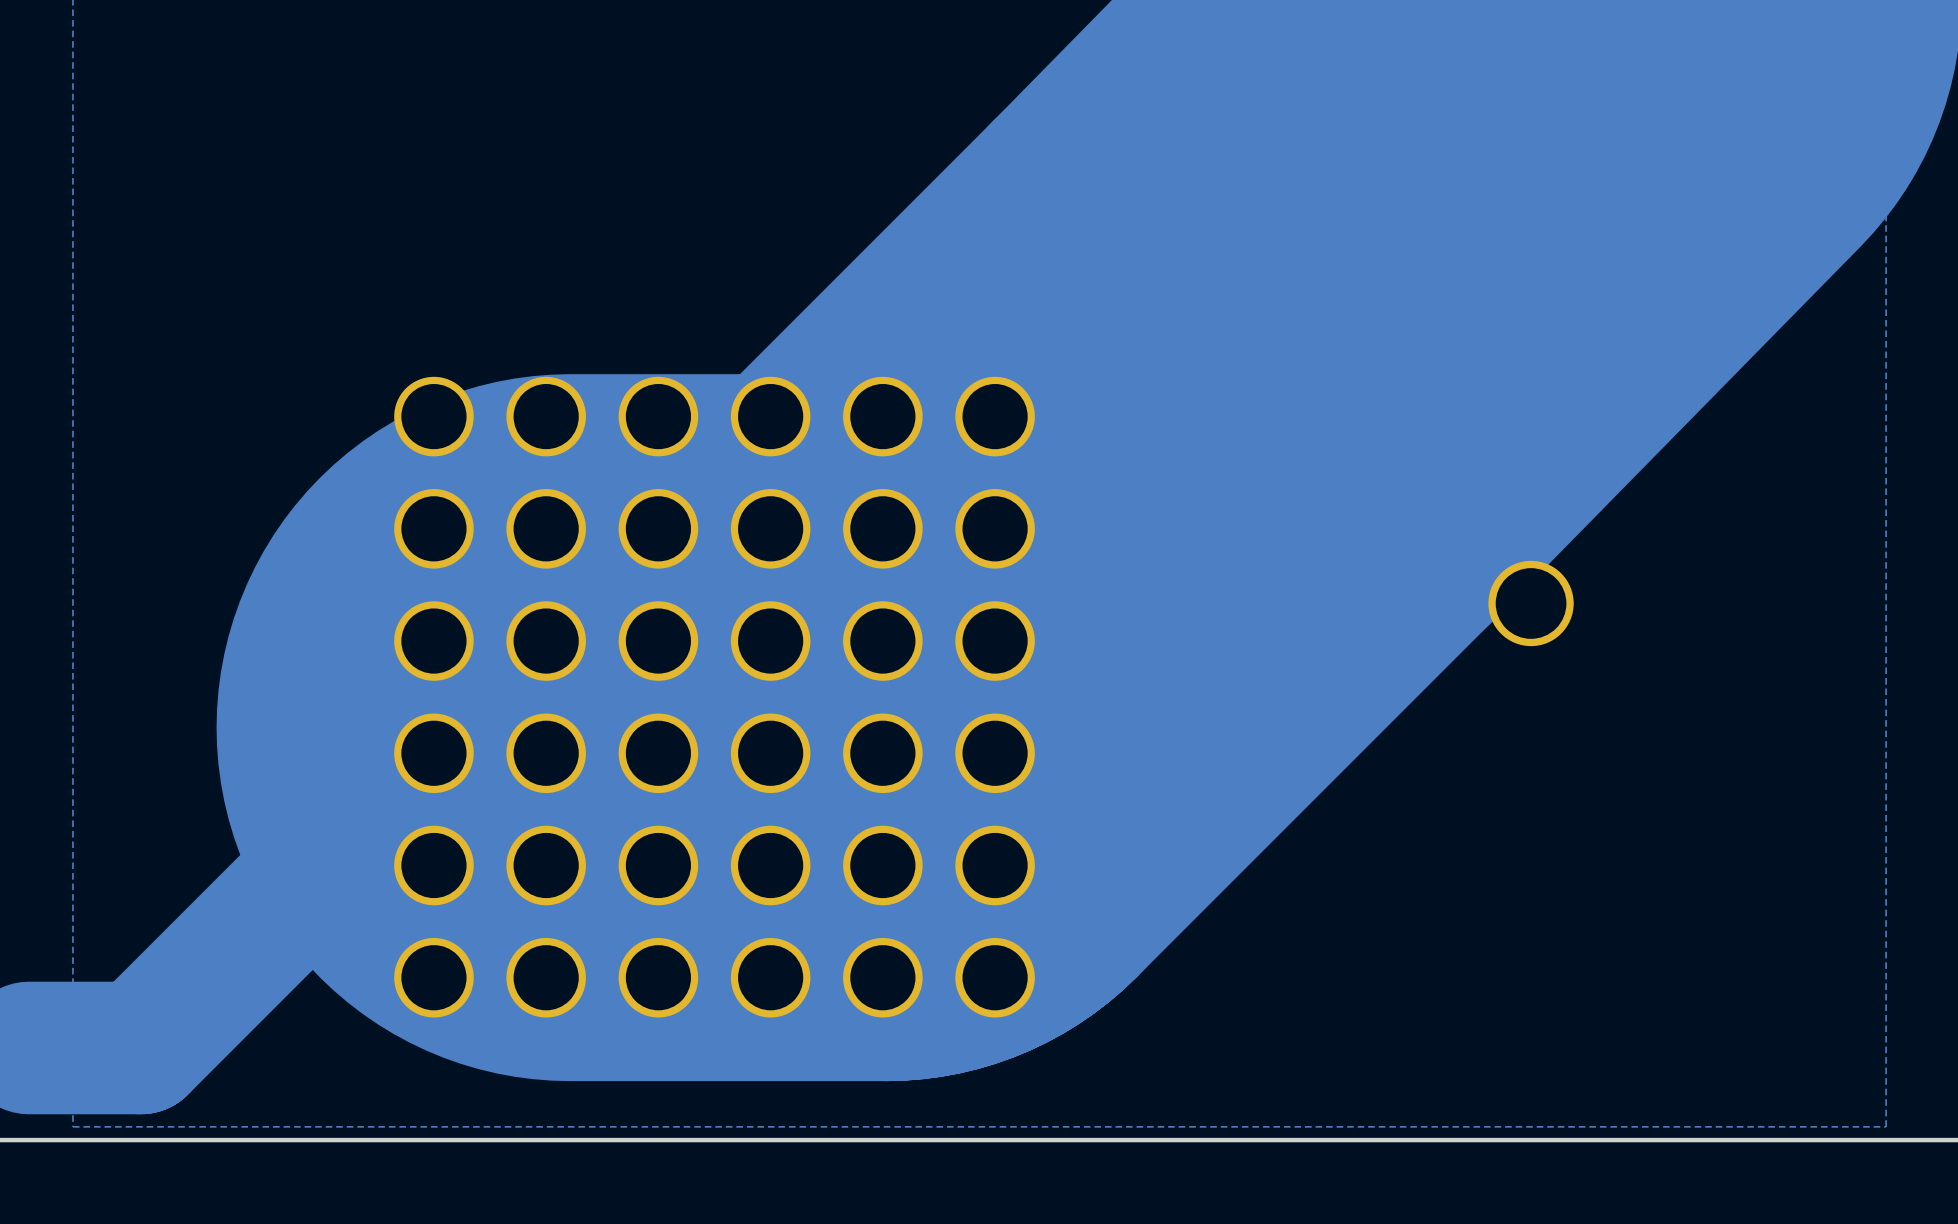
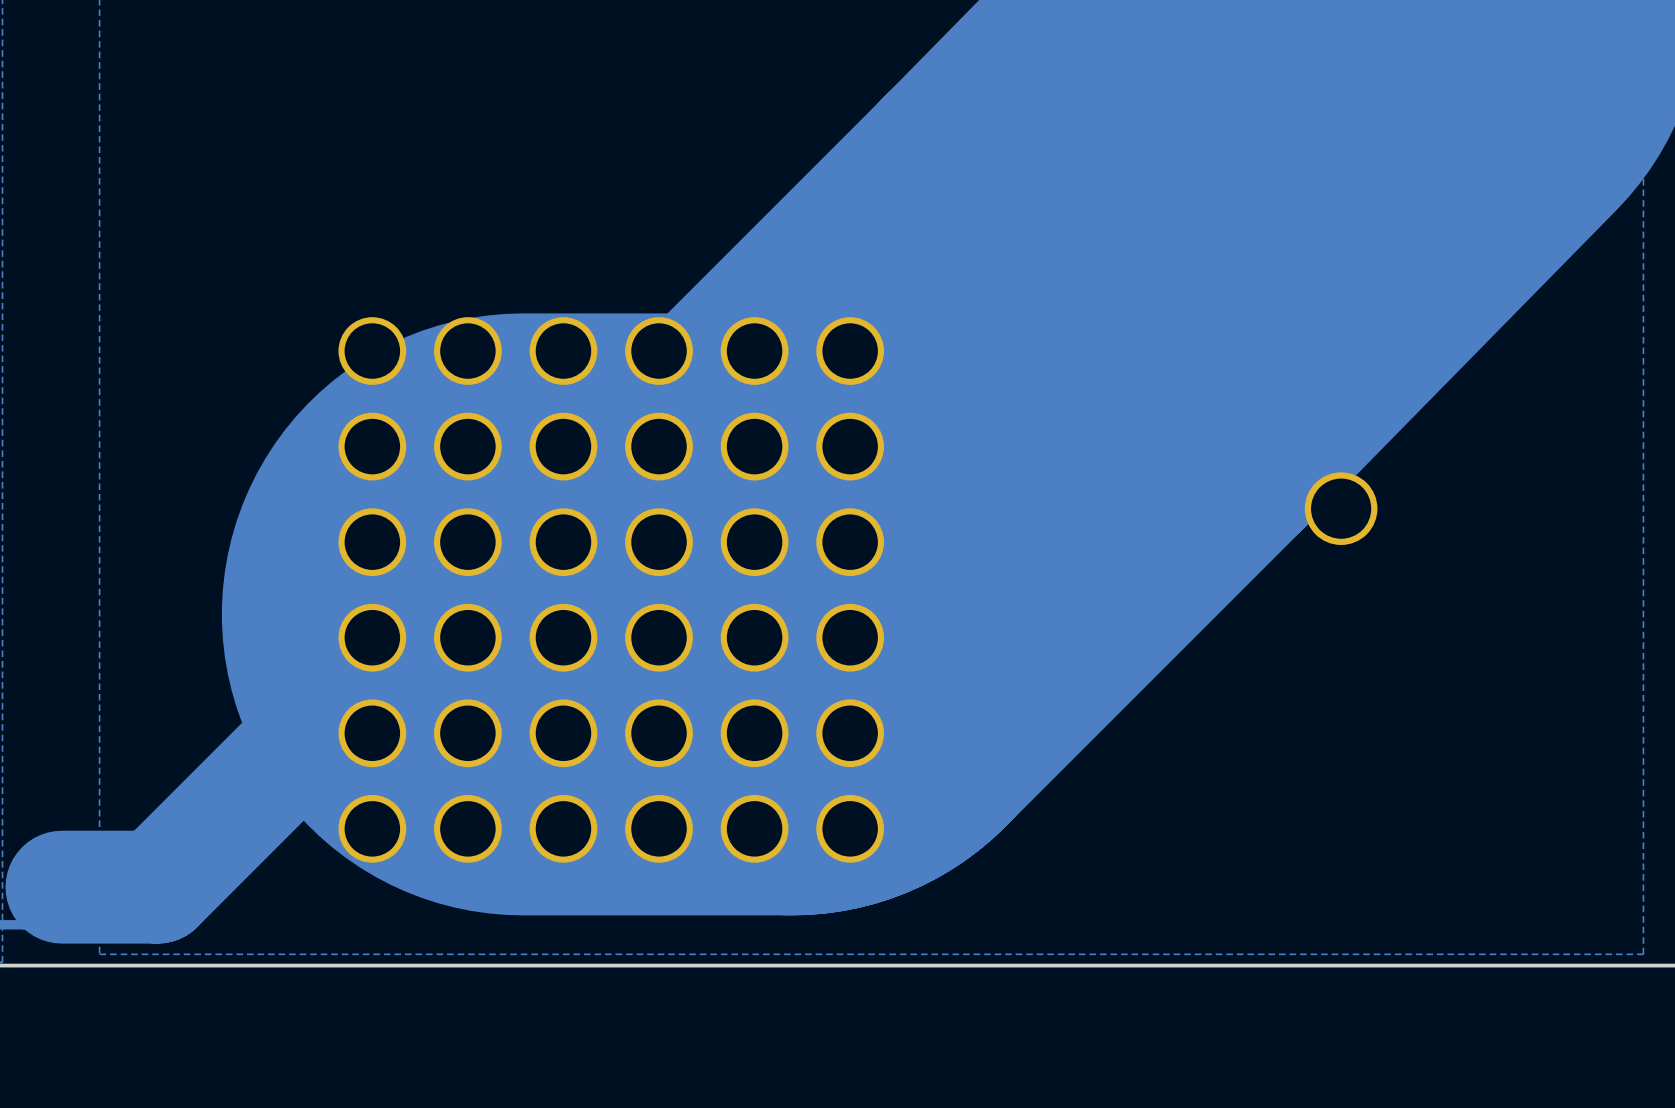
part position: (714, 697) -> (611, 589)

